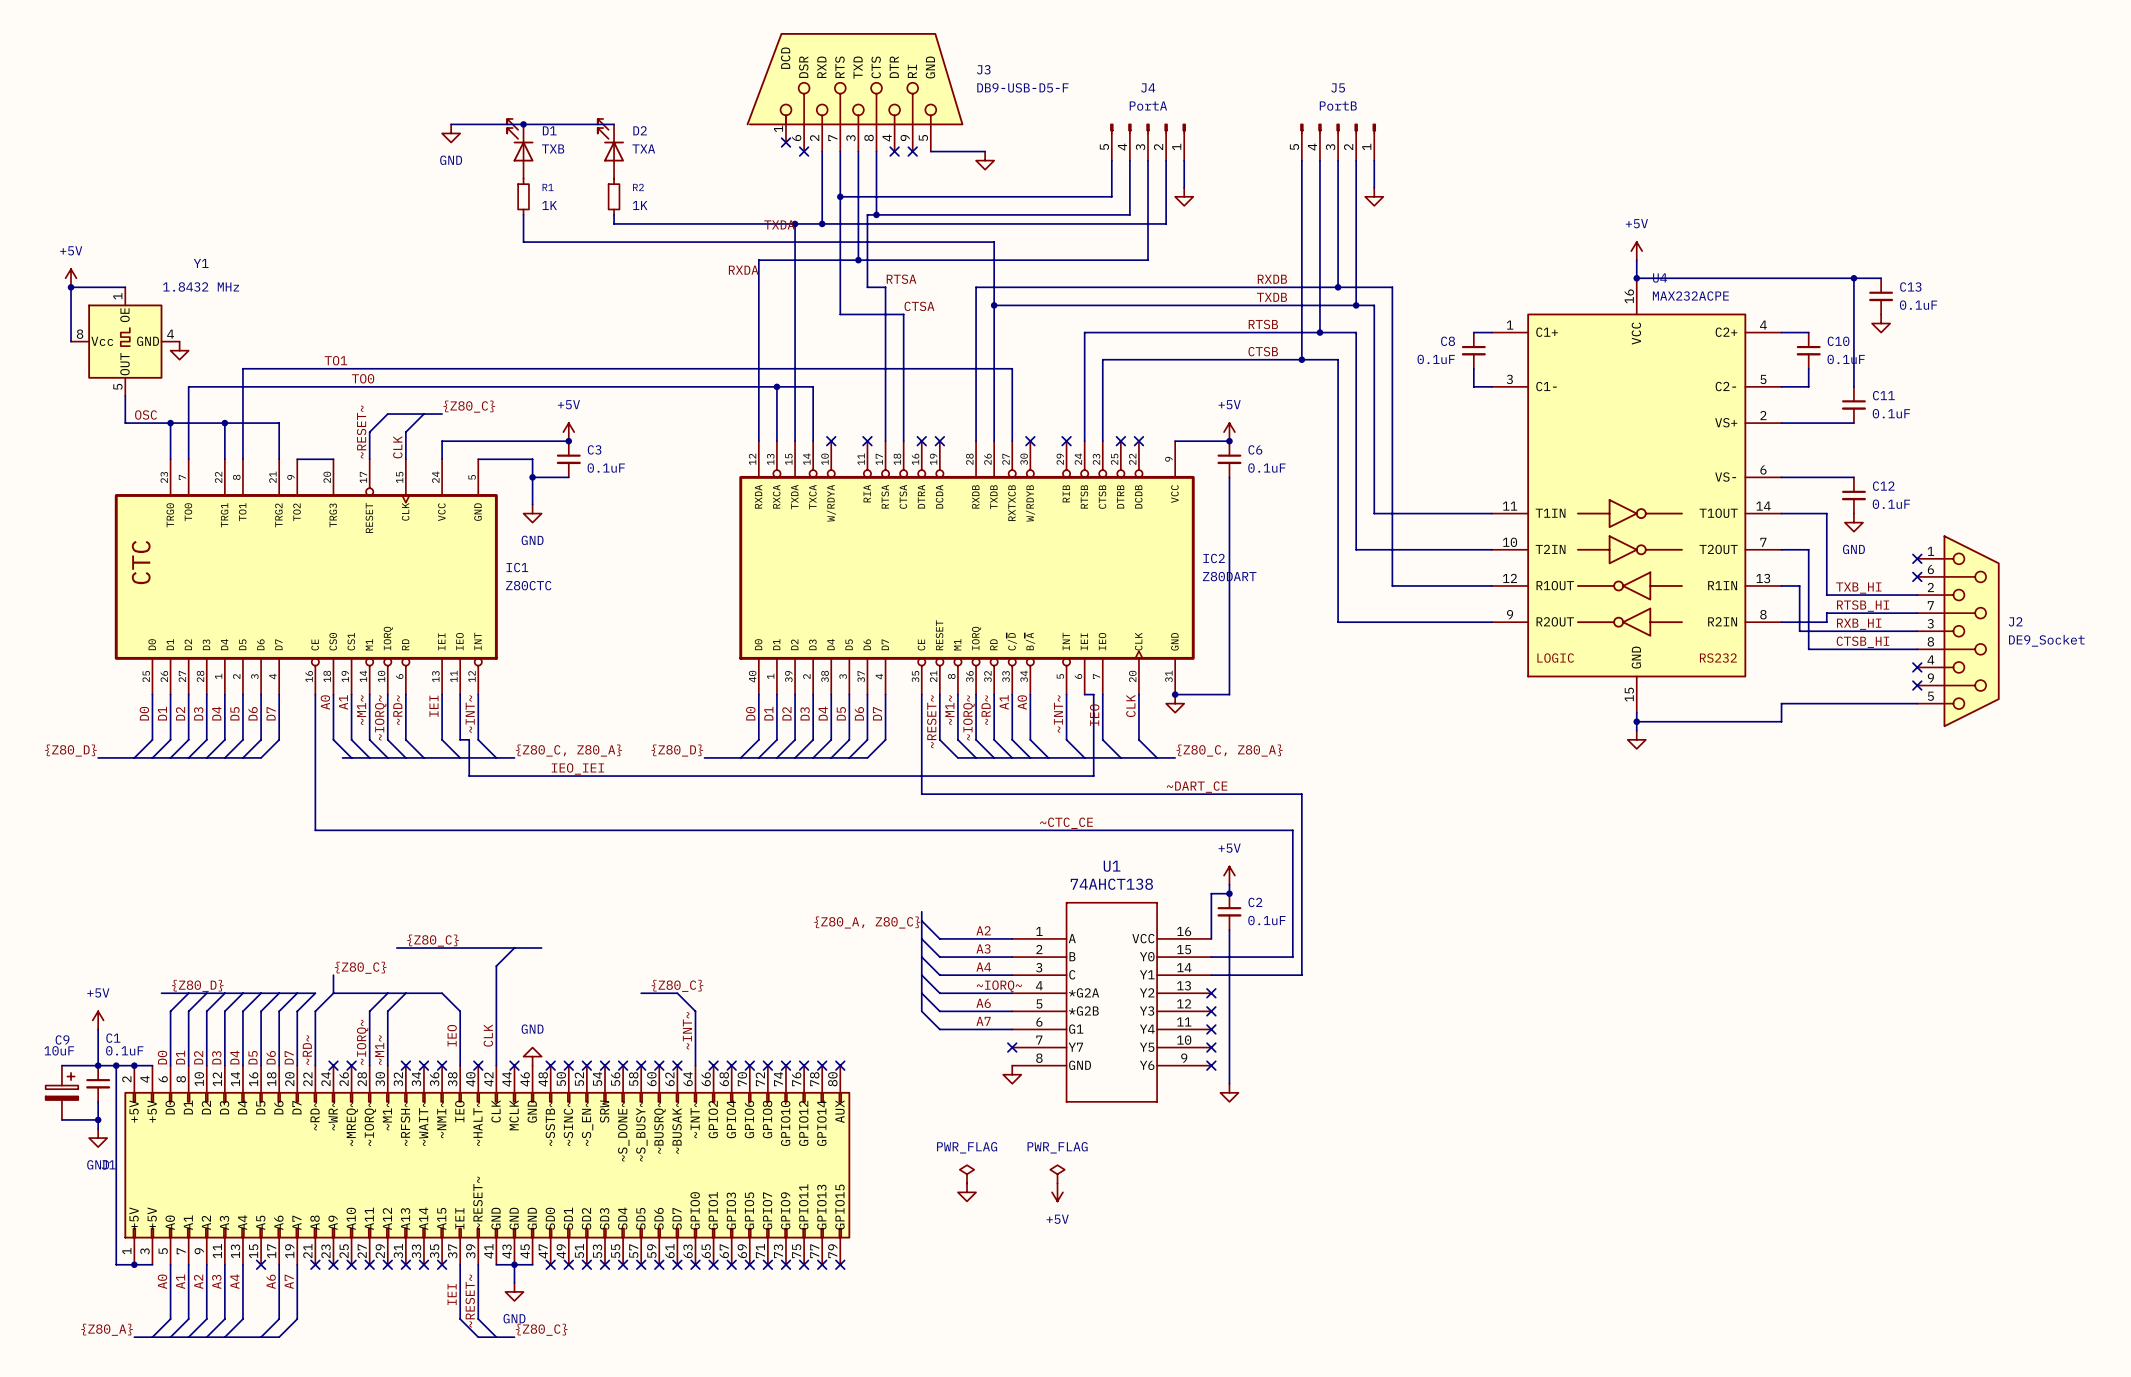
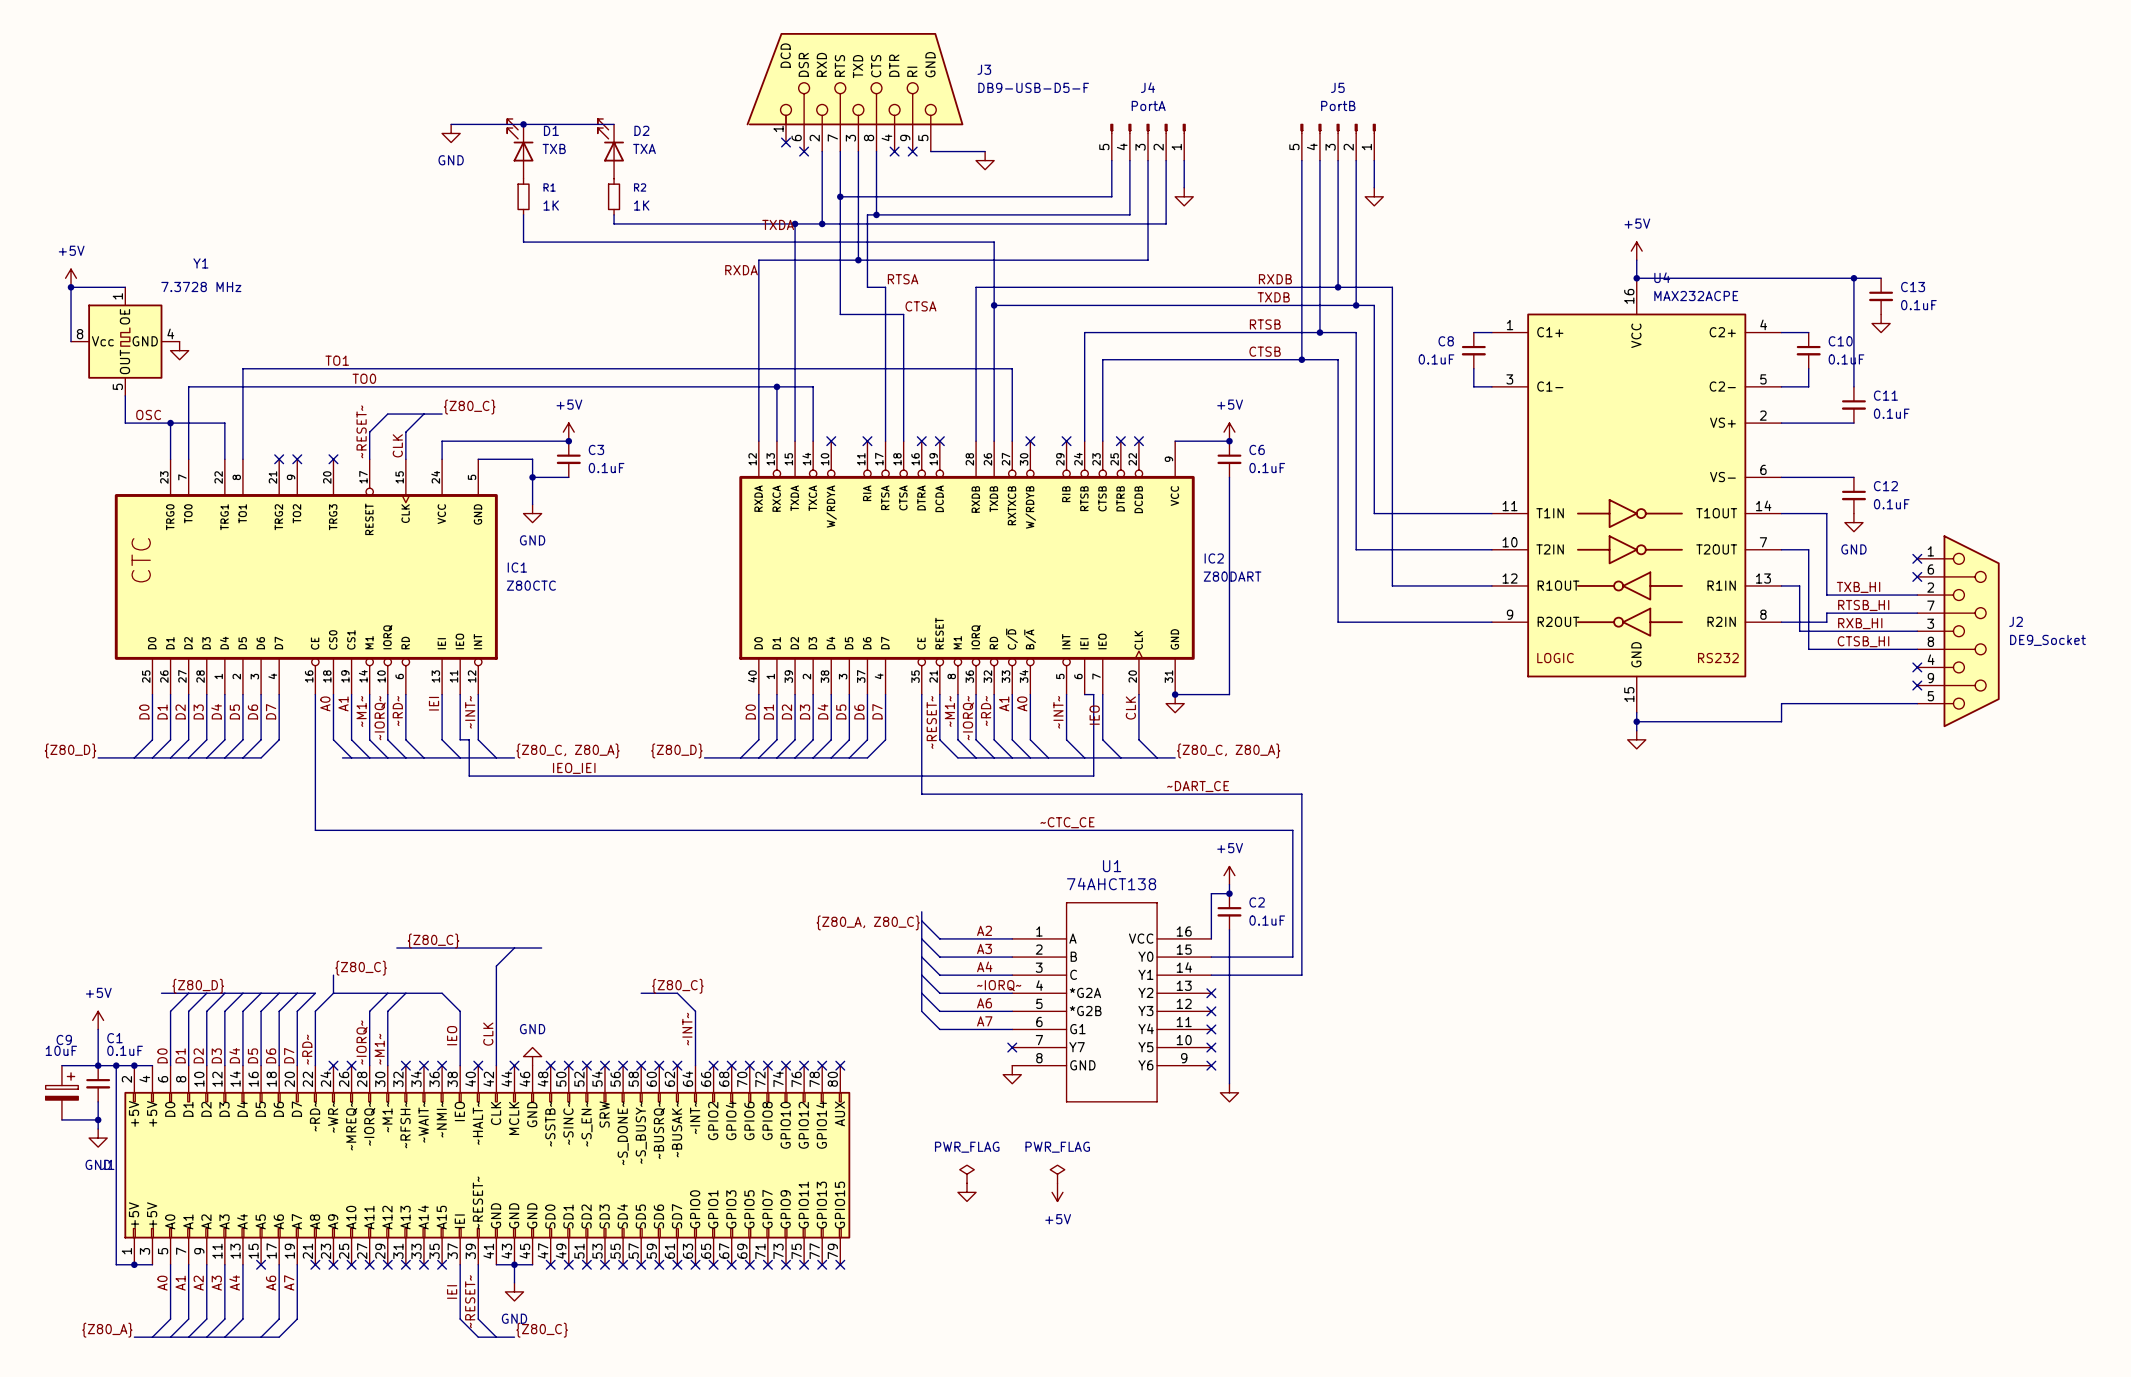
Y1 value: 1.8432 MHz (201, 286) -> 7.3728 MHz (201, 286)
wire: (224, 423) (279, 423) (279, 459) -> none
junction: (224, 423) -> none
no-connect mark: none -> (279, 459)
wire: (297, 459) (333, 459) -> none
no-connect mark: none -> (297, 459)
no-connect mark: none -> (333, 459)

